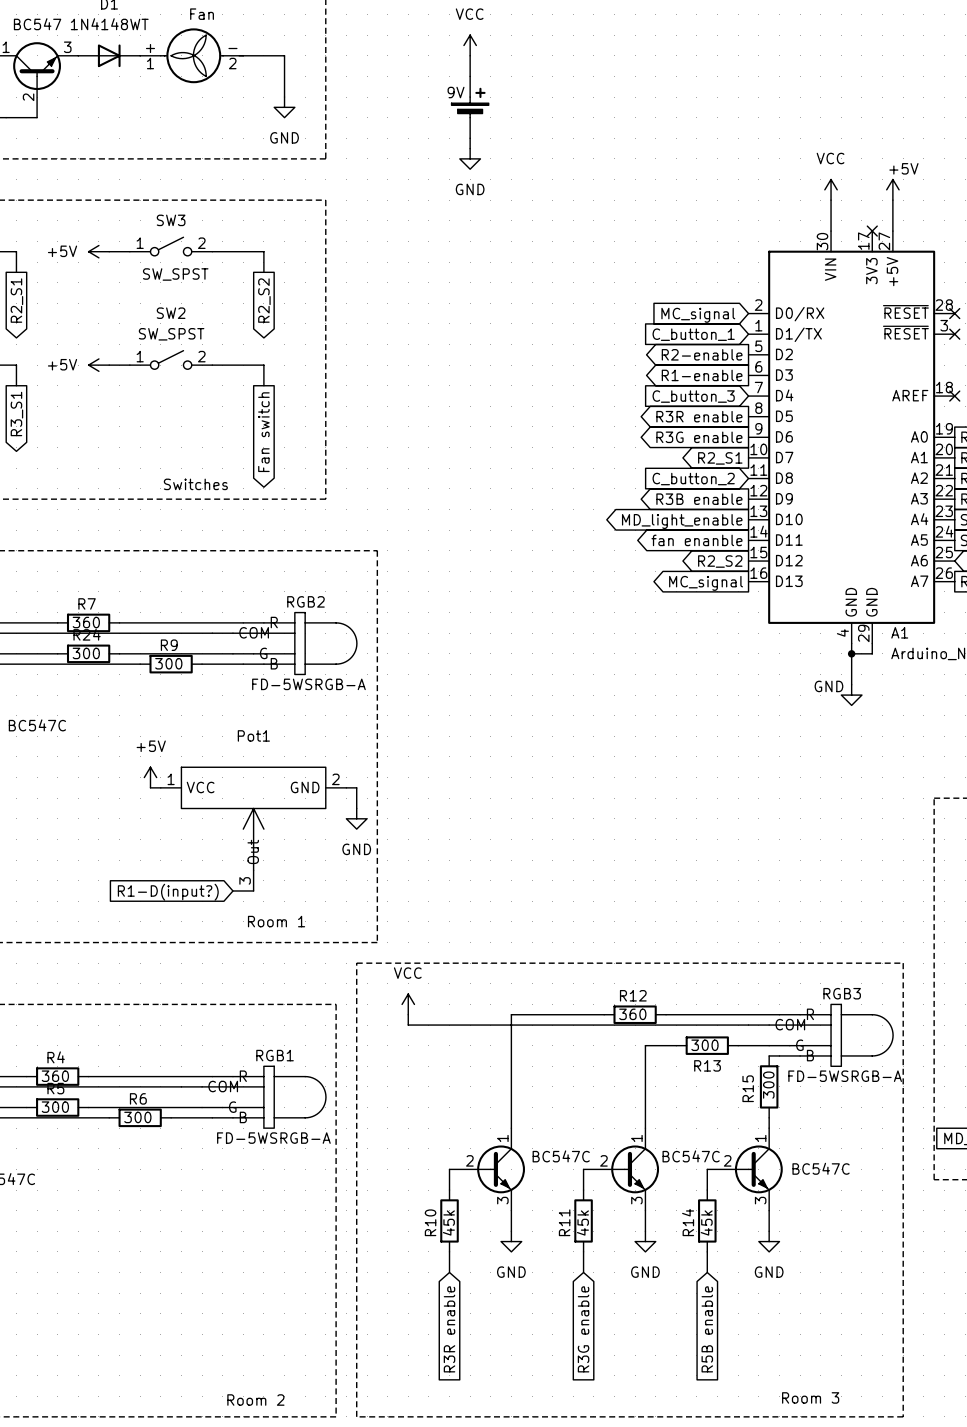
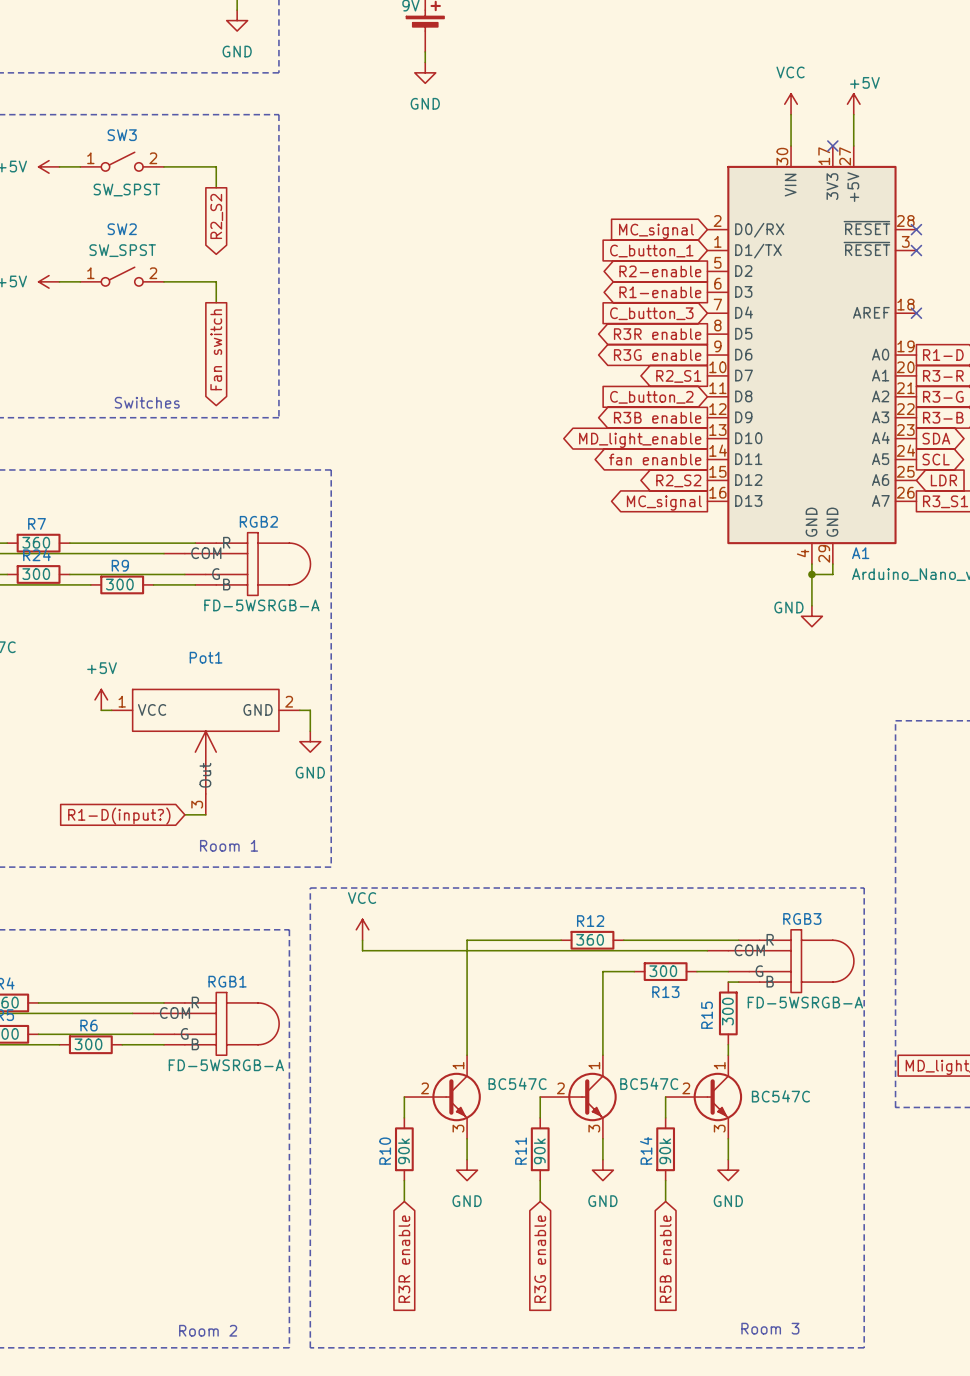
R10 value: 45k (448, 1223) -> 90k (403, 1151)
R11 value: 45k (582, 1223) -> 90k (539, 1151)
R14 value: 45k (706, 1223) -> 90k (665, 1151)

